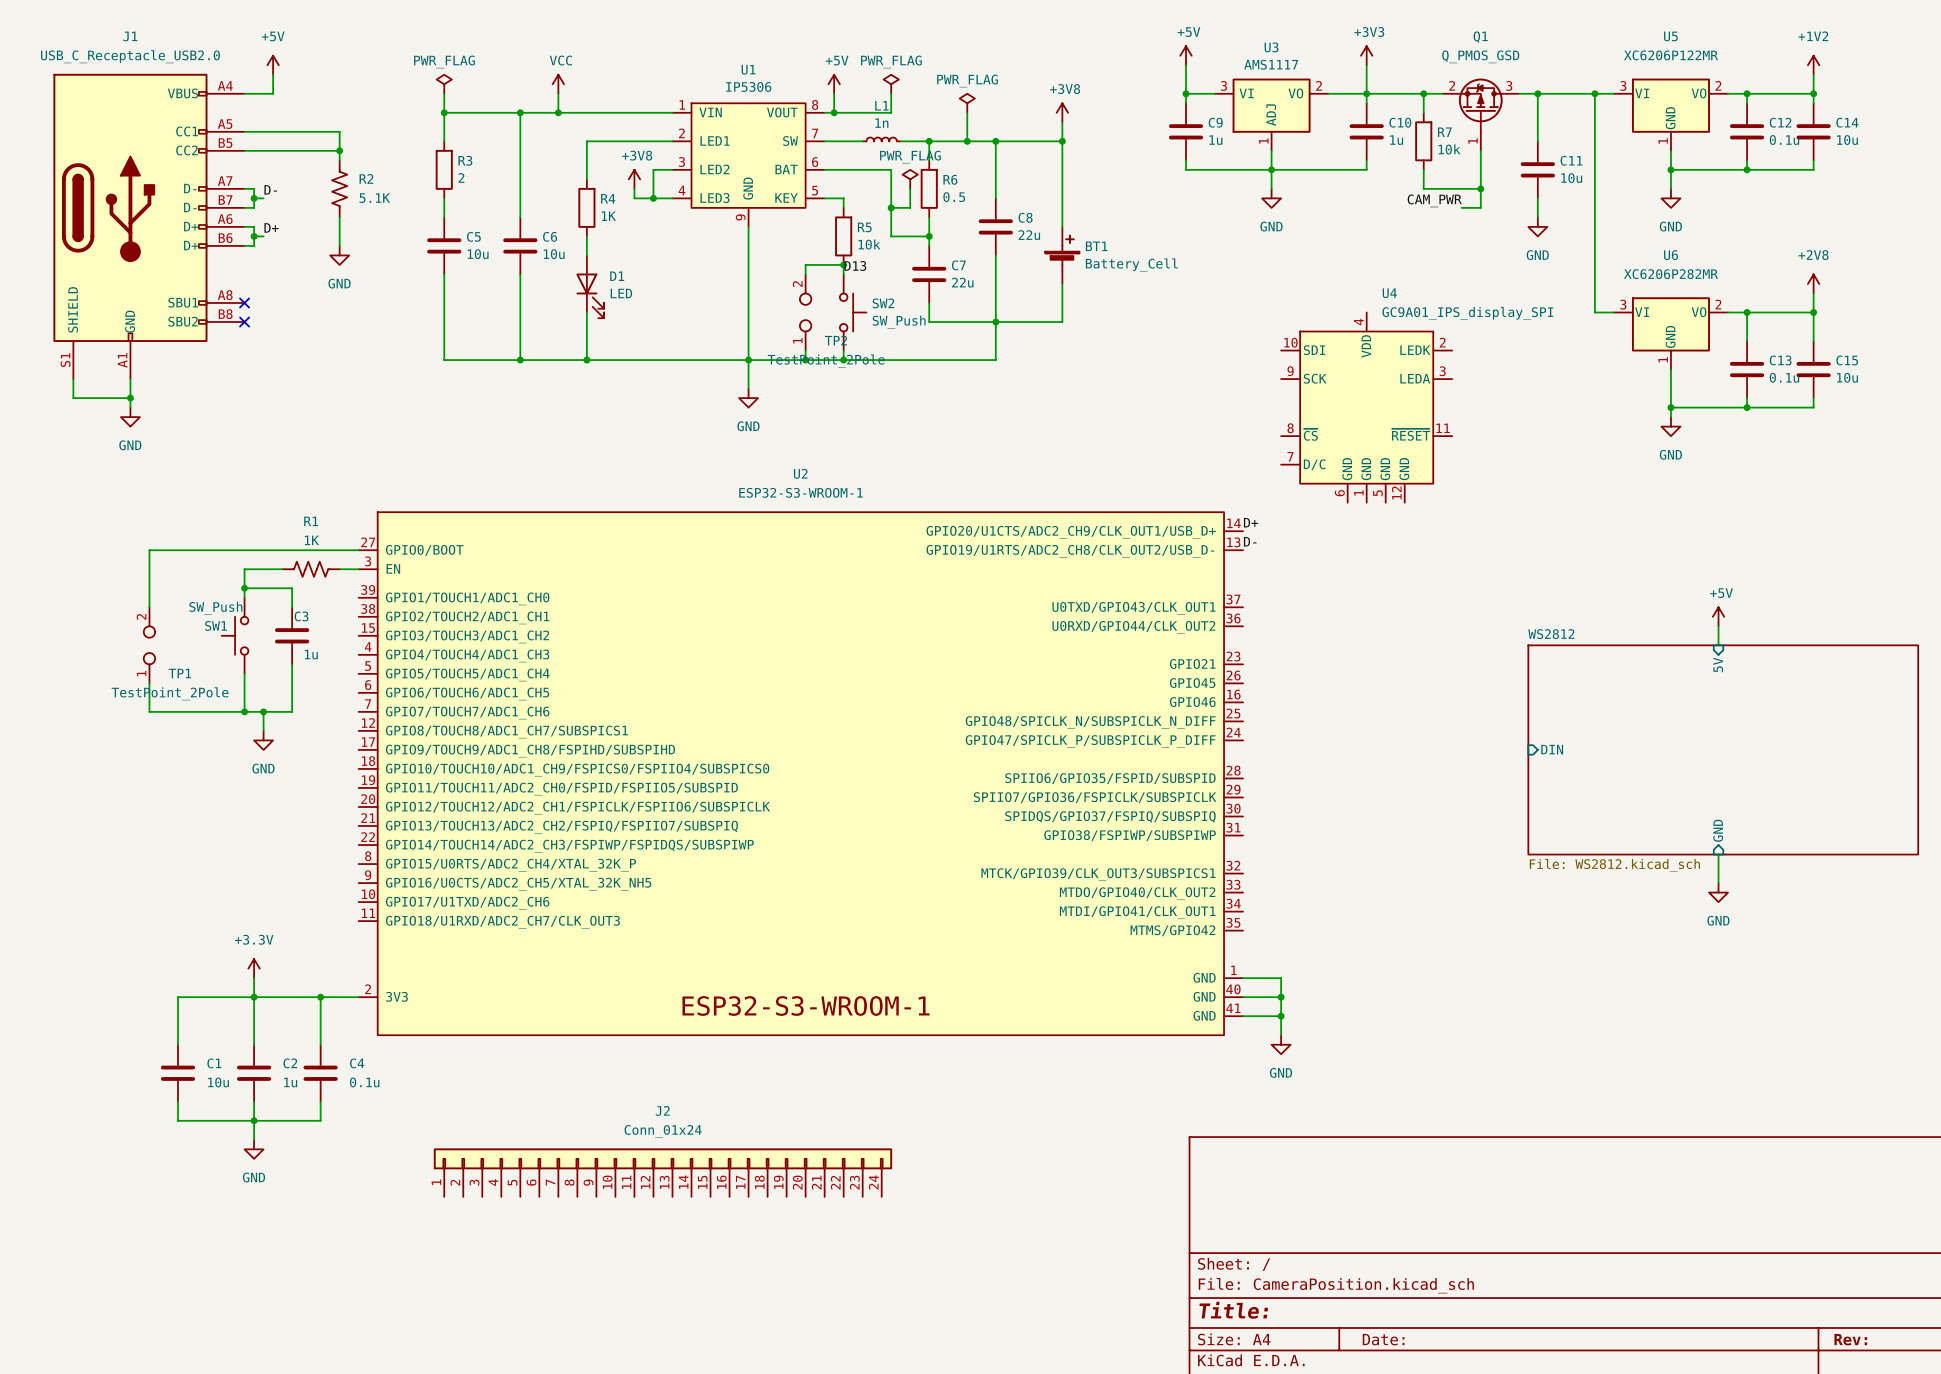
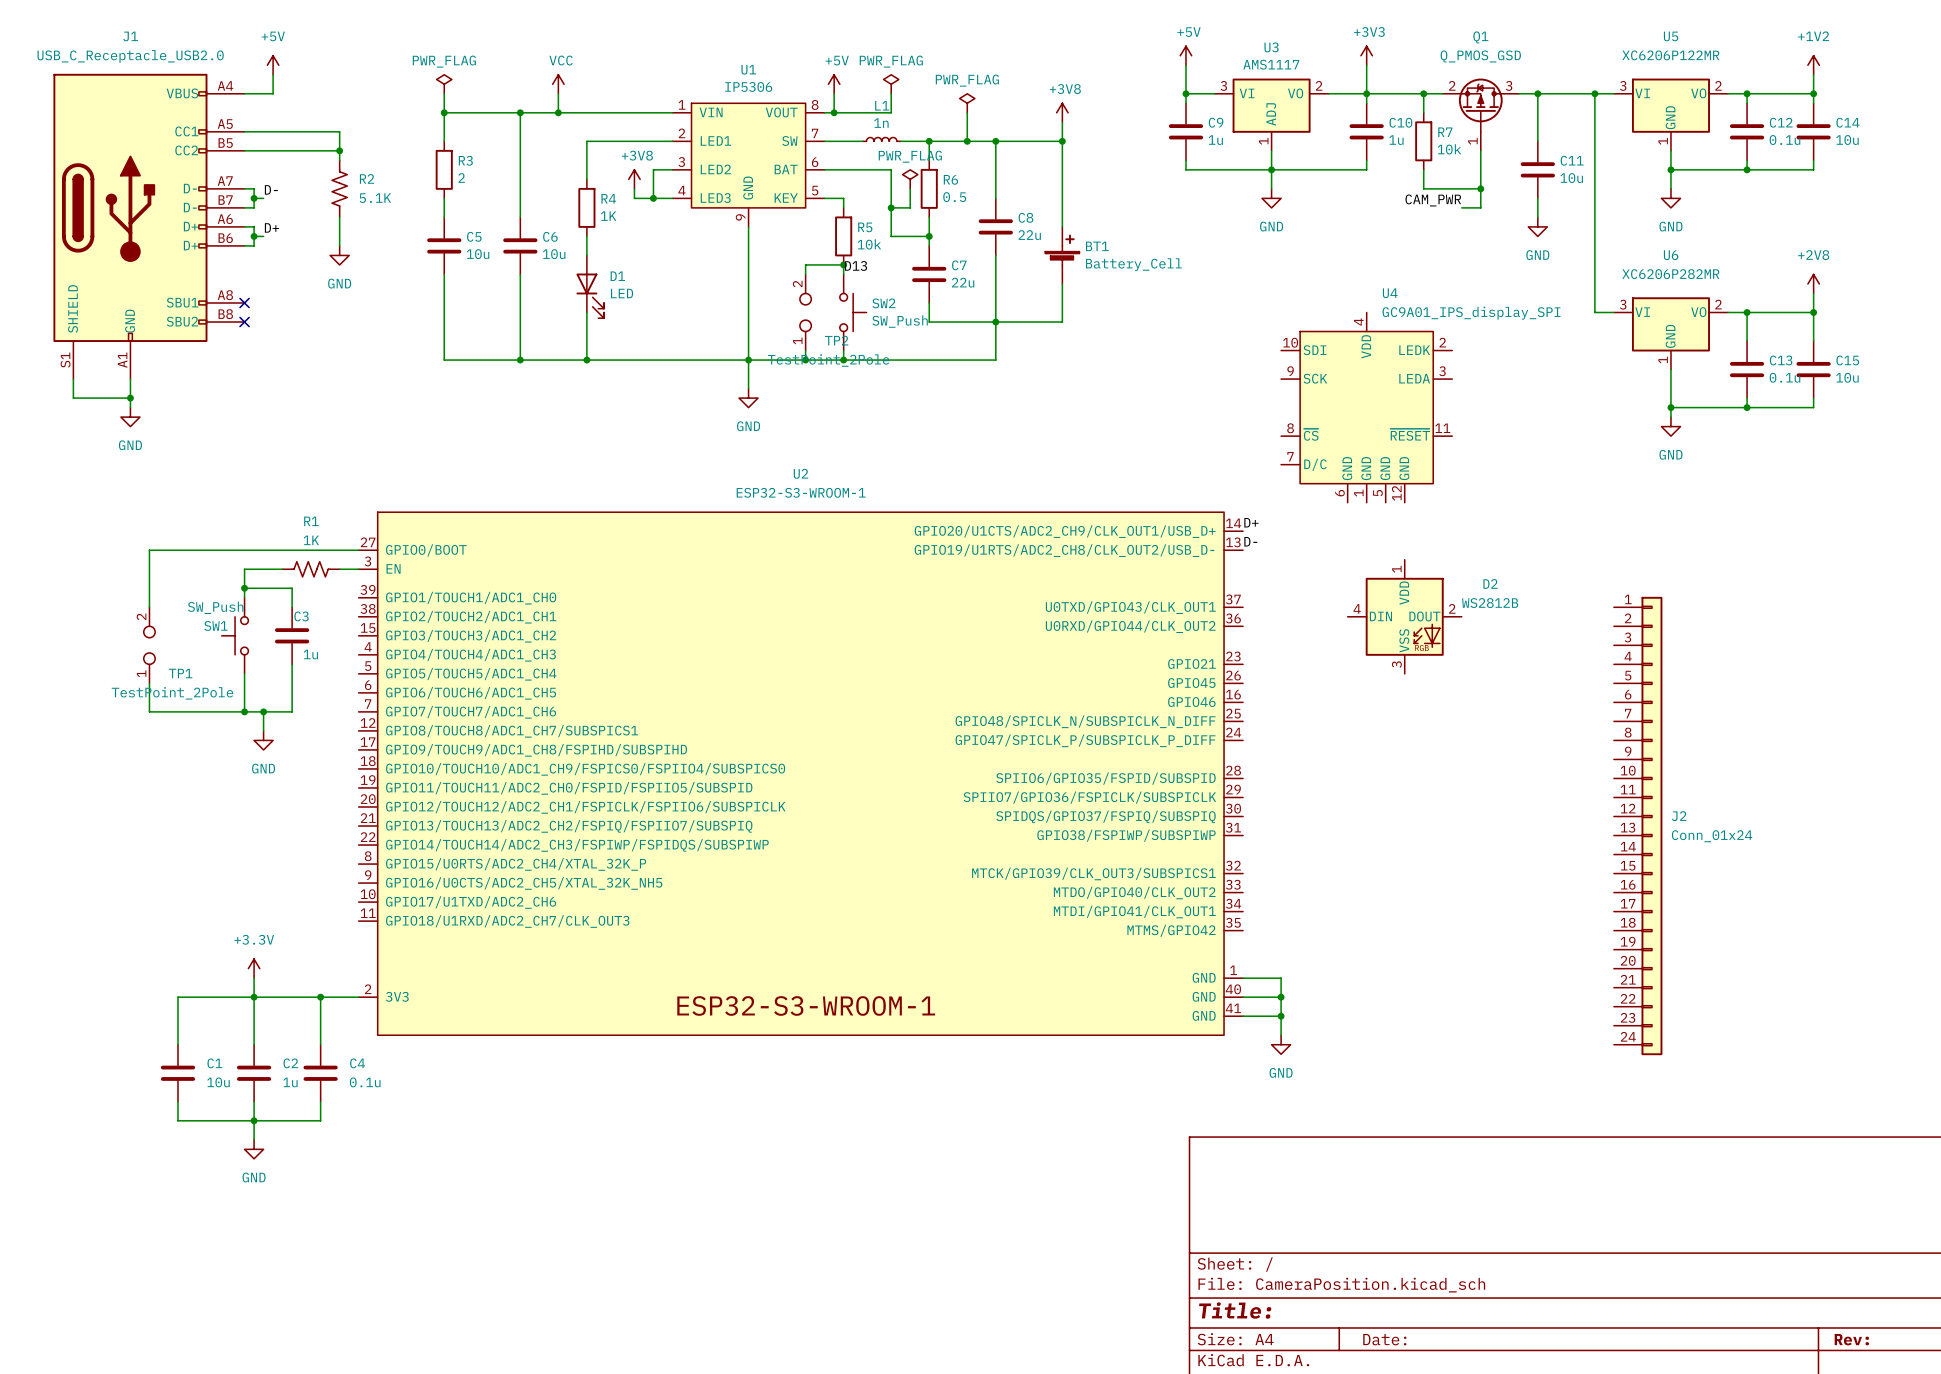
D2: none -> WS2812B (1404, 616)
power symbol: +5V (1718, 616) -> none
wire: (1718, 626) (1718, 645) -> none
sheet pin: 5V (1718, 664) -> none
sheet pin: DIN (1552, 749) -> none
sheet WS2812: File: WS2812.kicad_sch (1723, 749) -> none
sheet pin: GND (1718, 830) -> none
wire: (1718, 854) (1718, 883) -> none
power symbol: GND (1718, 892) -> none
J2 name position: J2 (662, 1110) -> J2 (1679, 816)
J2 value position: Conn_01x24 (663, 1131) -> Conn_01x24 (1712, 836)
J2 rotation: 0° (662, 1158) -> 90° clockwise (1651, 826)
J2 position: (662, 1172) -> (1638, 826)

